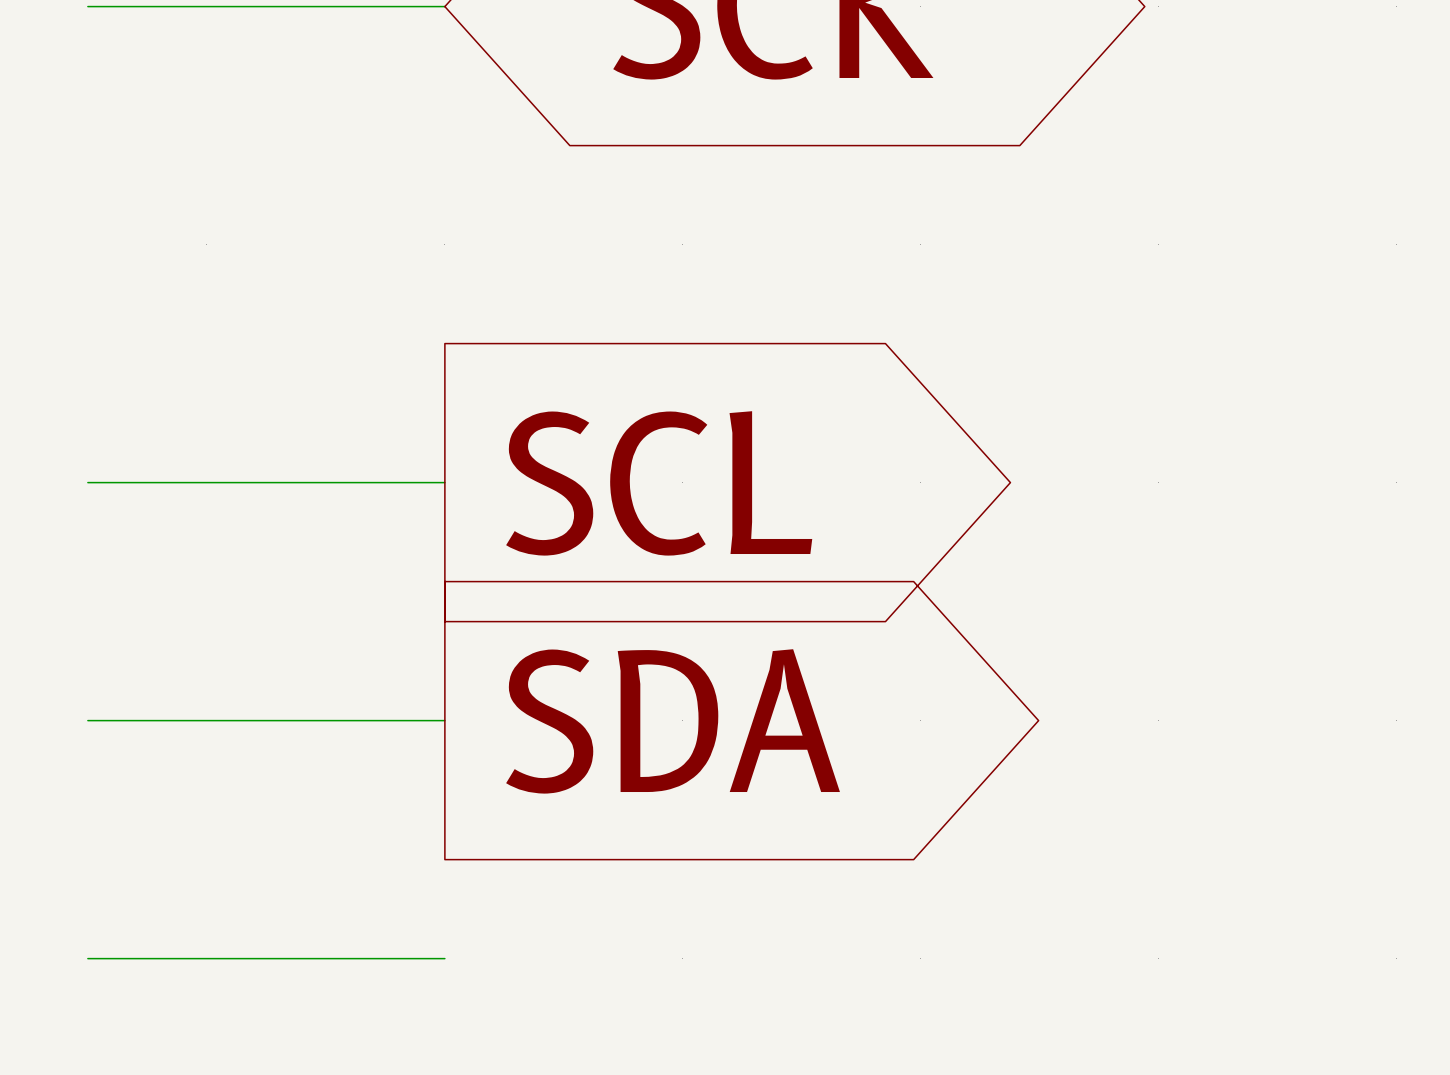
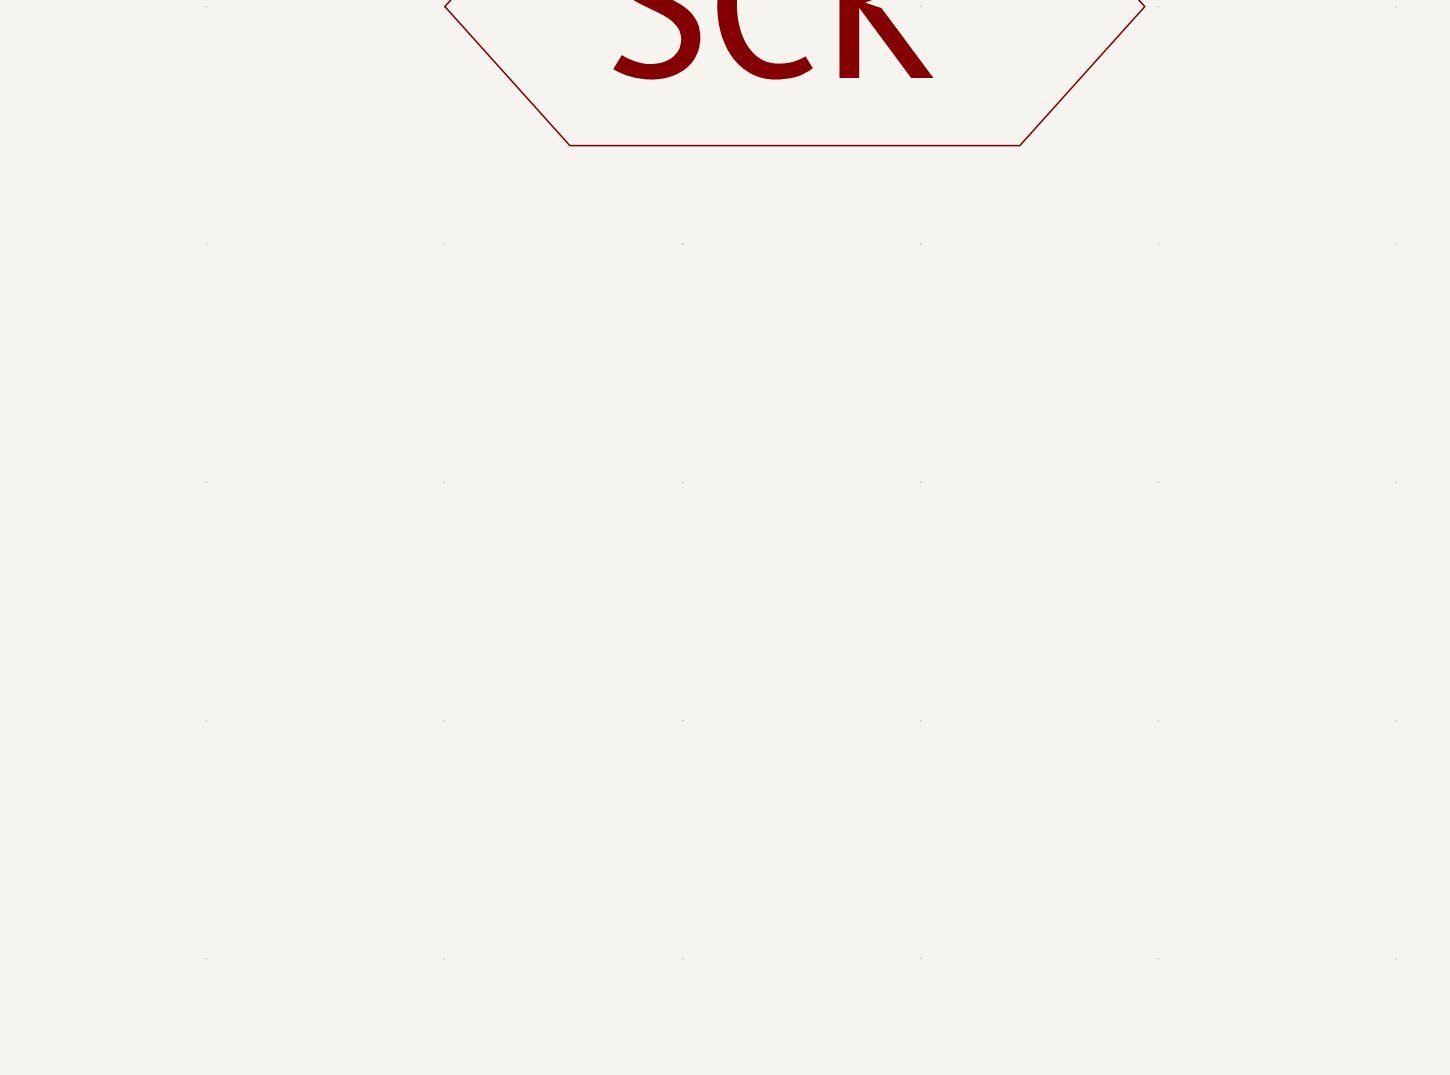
wire: (87, 6) (444, 6) -> none
wire: (87, 482) (444, 482) -> none
global label: SCL (659, 483) -> none
wire: (87, 720) (444, 720) -> none
global label: SDA (673, 721) -> none
wire: (87, 958) (444, 958) -> none

